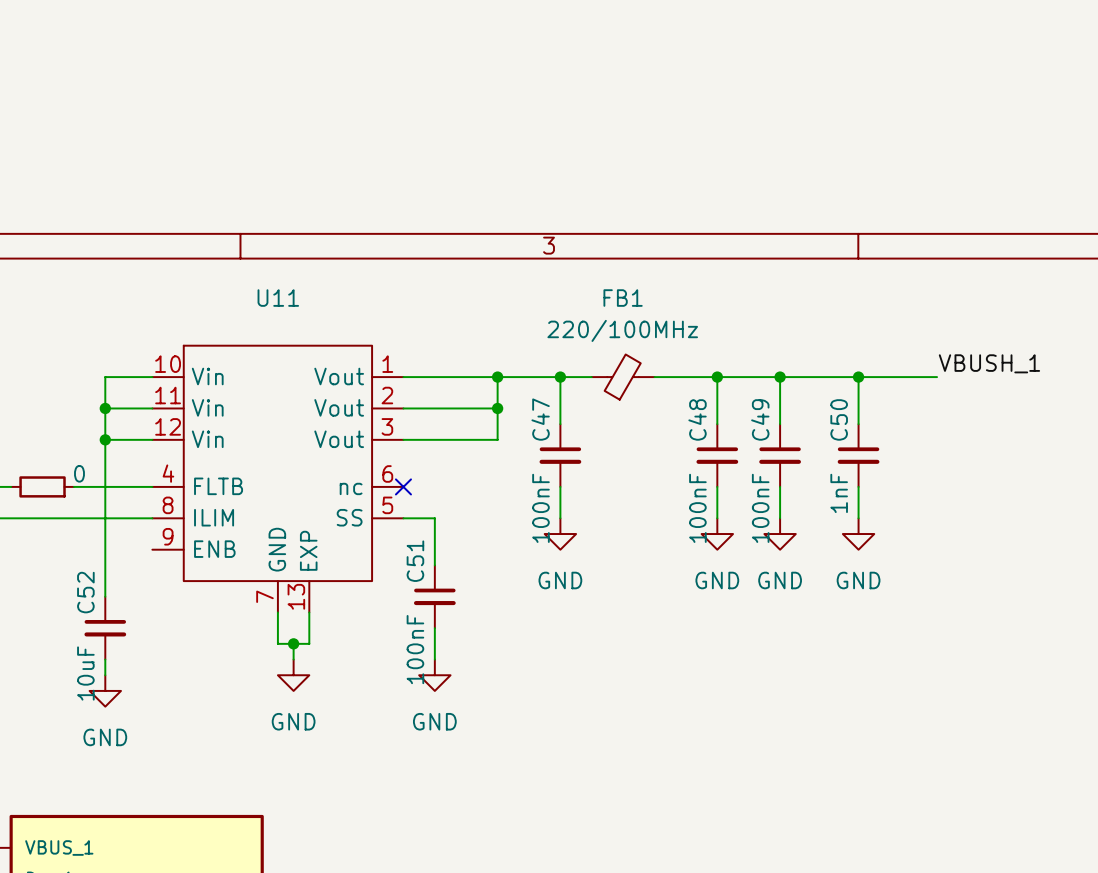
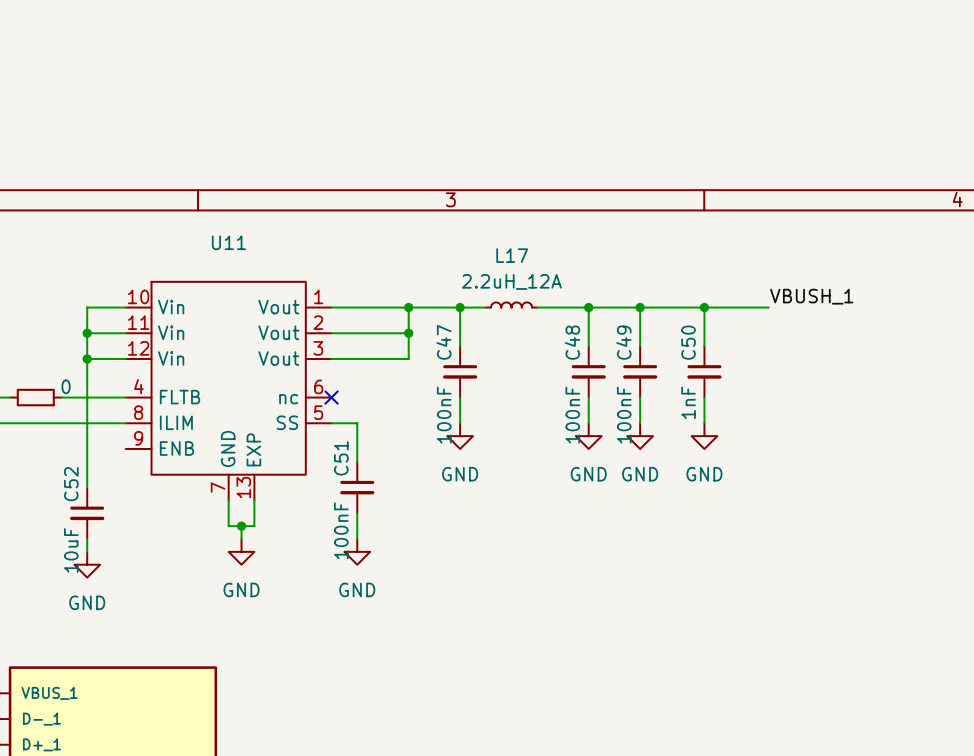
L17: none -> 2.2uH_12A (511, 304)
FB1: 220/100MHz (623, 377) -> none

